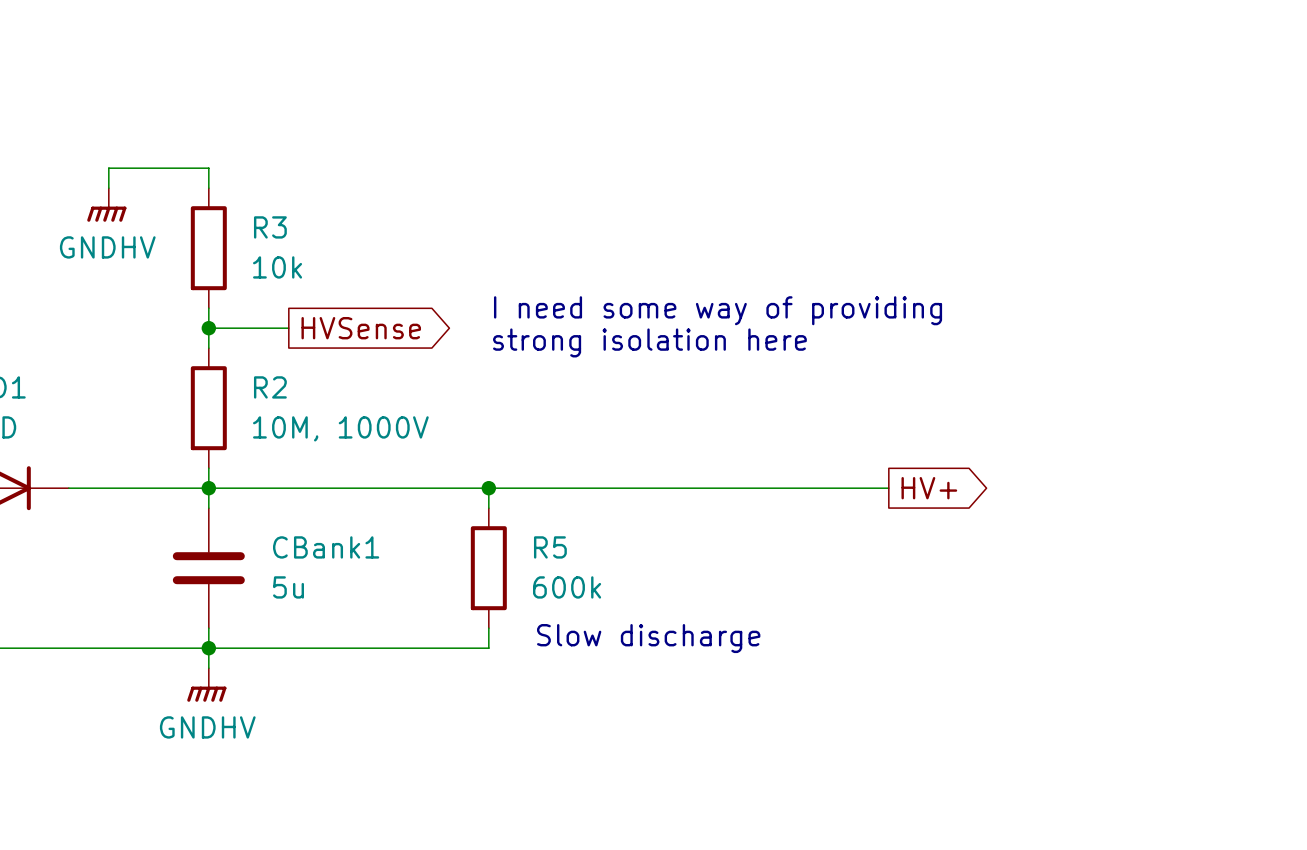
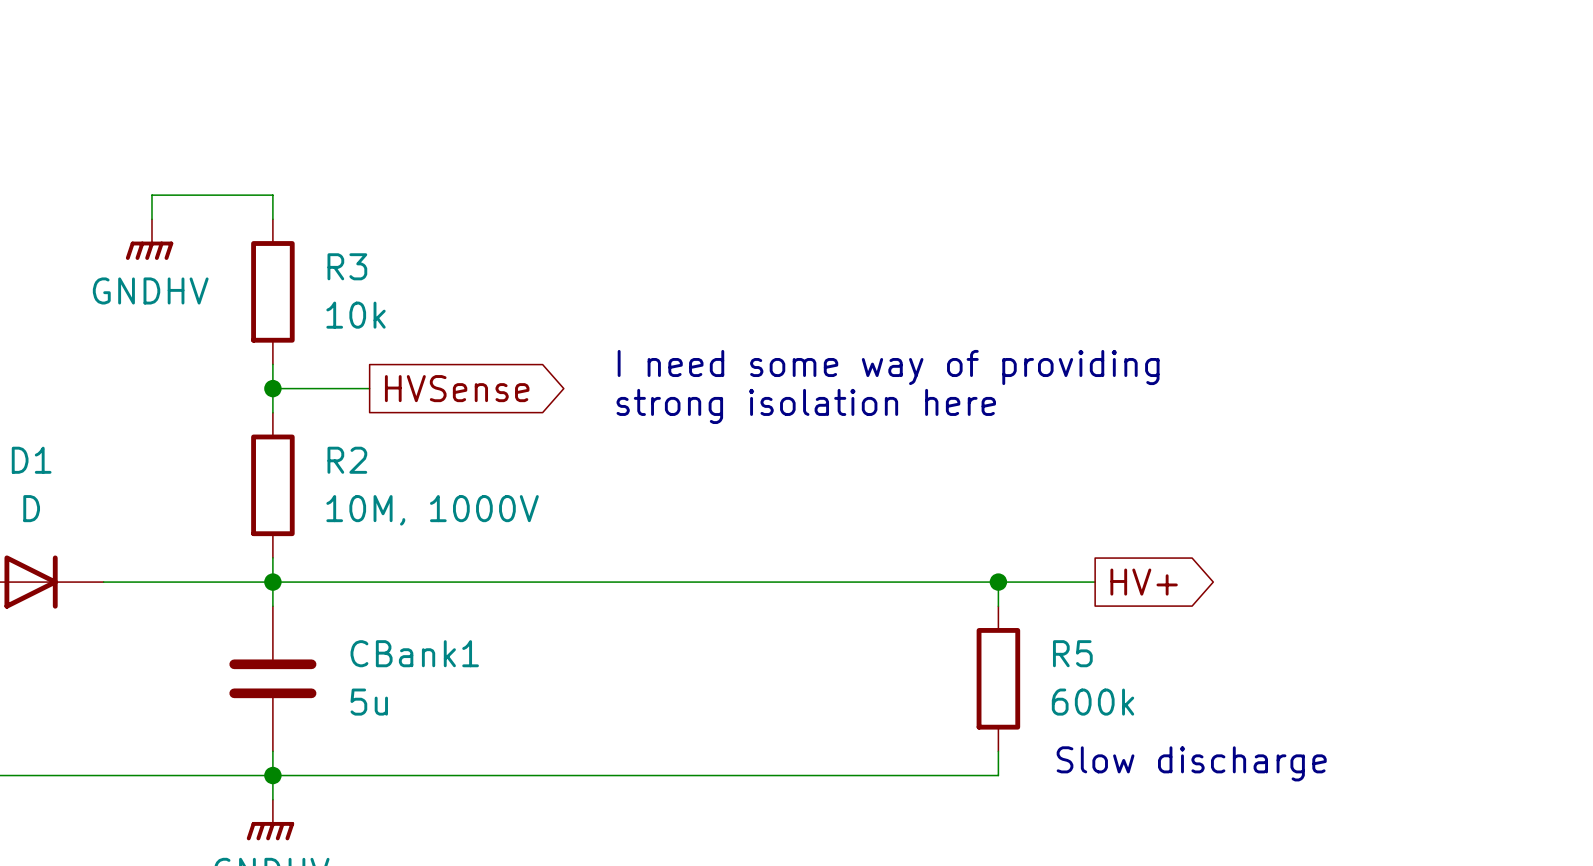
wire: (488, 488) (488, 508) -> (998, 582) (998, 606)
junction: (488, 488) -> none
junction: none -> (998, 582)
R5 position: (488, 568) -> (998, 678)
wire: (488, 628) (488, 648) -> (998, 751) (998, 775) (611, 775)
text position: Slow discharge (648, 638) -> Slow discharge (1191, 763)

